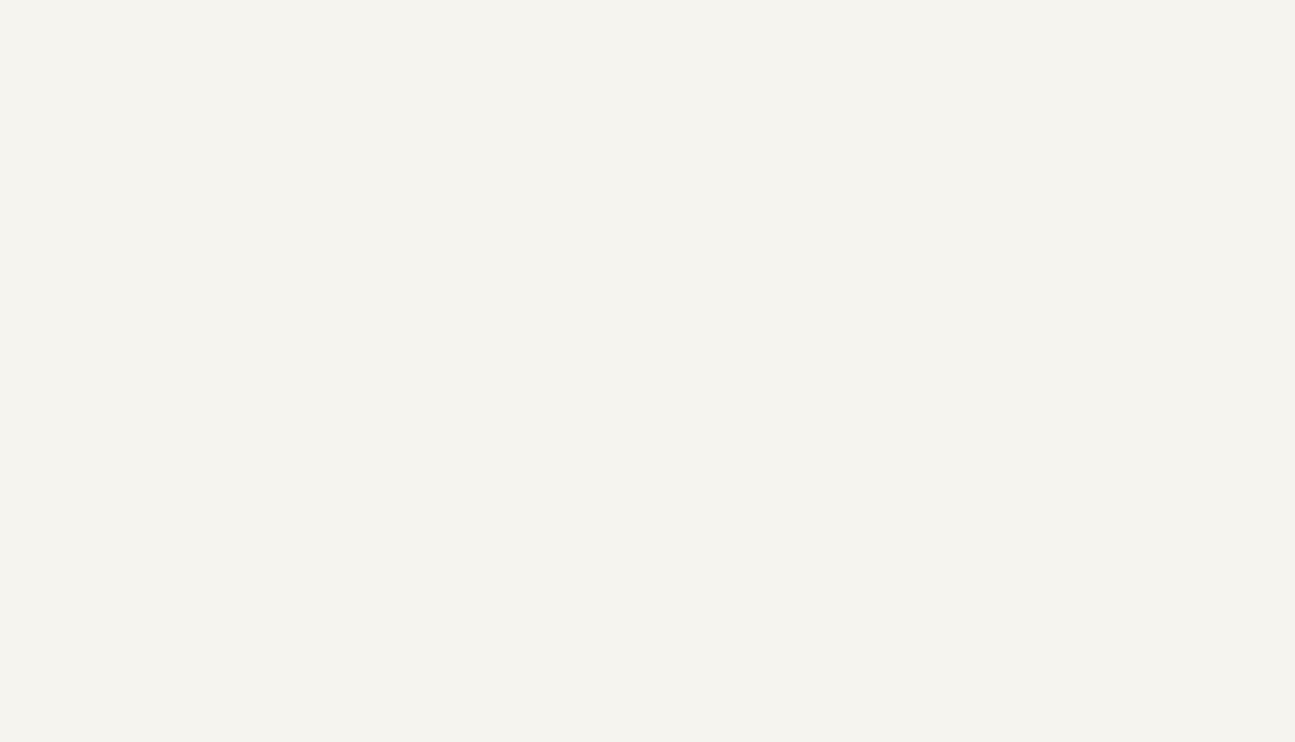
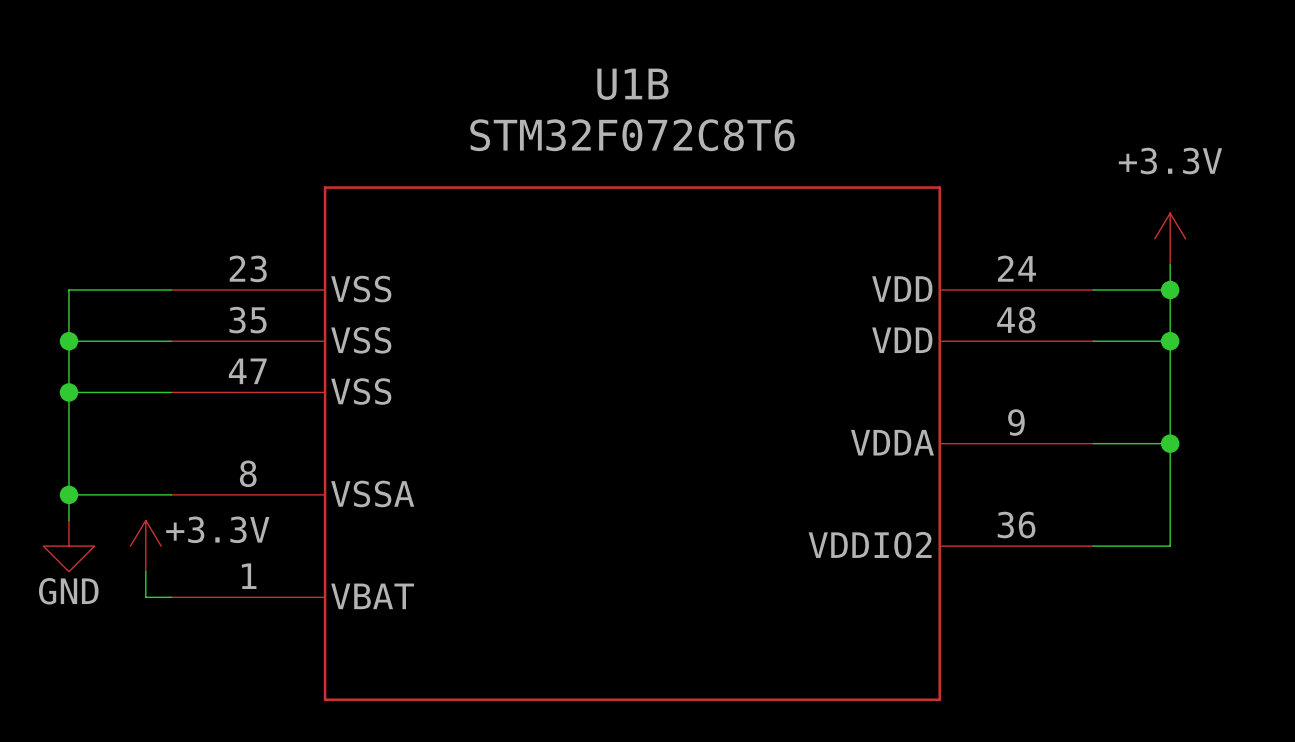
power symbol: none -> +3.3V (1170, 238)
wire: none -> (1170, 264) (1170, 546) (1093, 546)
wire: none -> (171, 290) (68, 290) (68, 520)
wire: none -> (1093, 290) (1170, 290)
junction: none -> (1170, 290)
wire: none -> (68, 341) (171, 341)
junction: none -> (68, 341)
wire: none -> (1093, 341) (1170, 341)
junction: none -> (1170, 341)
wire: none -> (68, 392) (171, 392)
junction: none -> (68, 392)
U1B: none -> STM32F072C8T6 (632, 443)
wire: none -> (1093, 443) (1170, 443)
junction: none -> (1170, 443)
wire: none -> (68, 494) (171, 494)
junction: none -> (68, 494)
power symbol: none -> GND (68, 546)
power symbol: none -> +3.3V (145, 546)
wire: none -> (145, 571) (145, 597) (171, 597)

